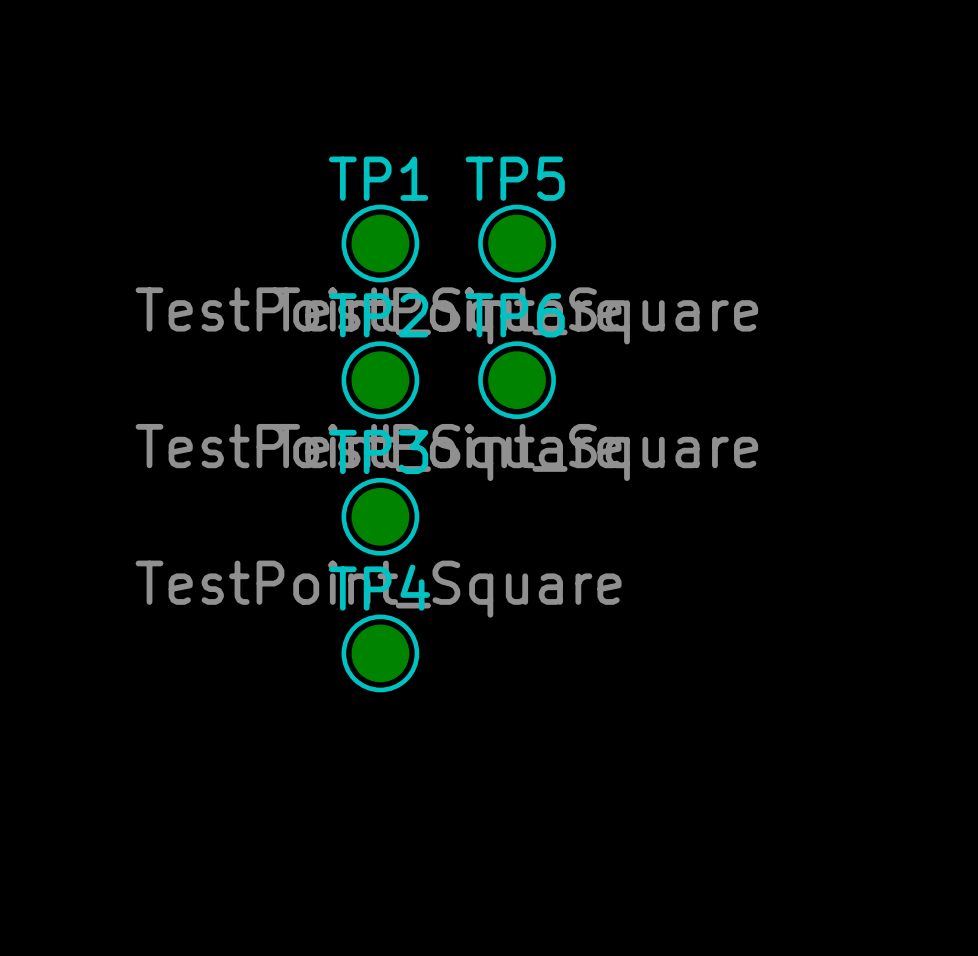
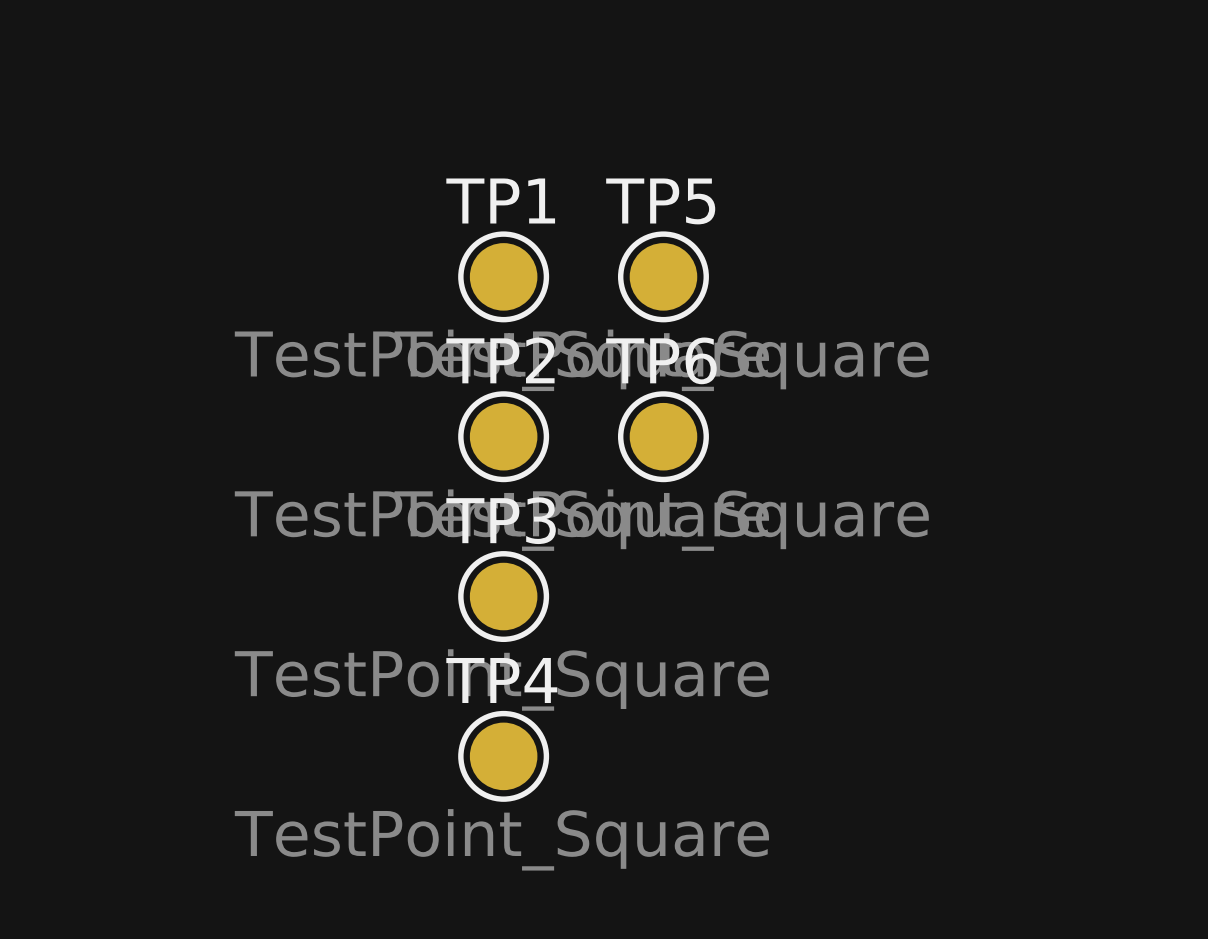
TP4 value: none -> TestPoint_Square (501, 839)

